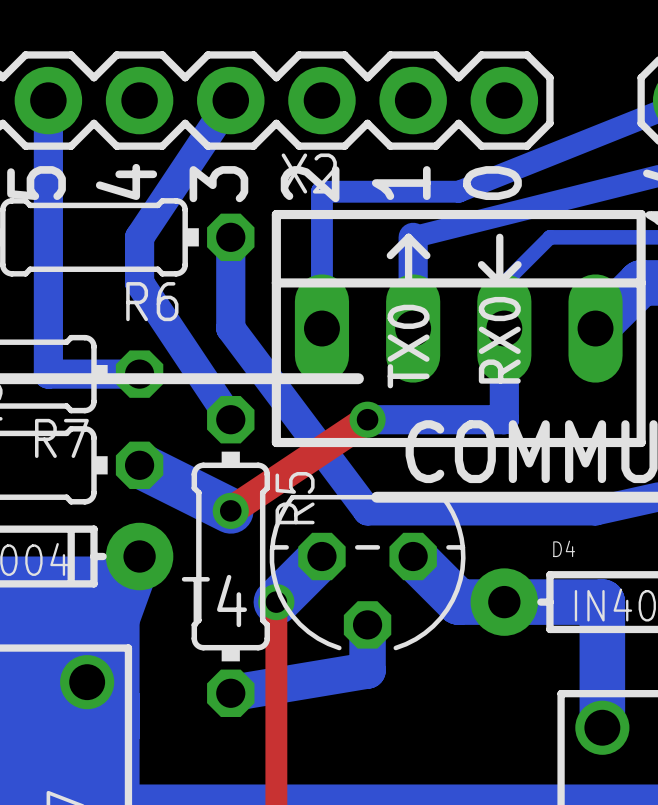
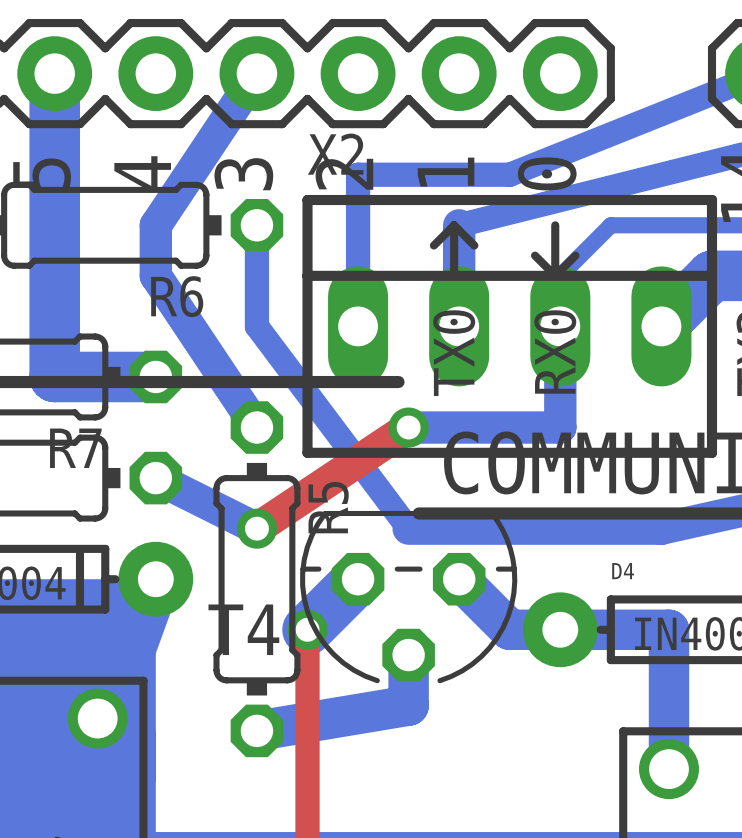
bottom track width: thin (48, 100) (48, 374) (139, 374) -> thick (54, 73) (54, 376) (155, 376)
bottom track width: thick (230, 237) (230, 328) (367, 510) -> thin (256, 225) (256, 326) (408, 528)
bottom track width: thick (139, 465) (230, 510) -> thin (155, 478) (256, 528)
bottom track width: thick (413, 556) (458, 602) (602, 602) (602, 727) -> thin (459, 579) (509, 629) (668, 629) (668, 769)

